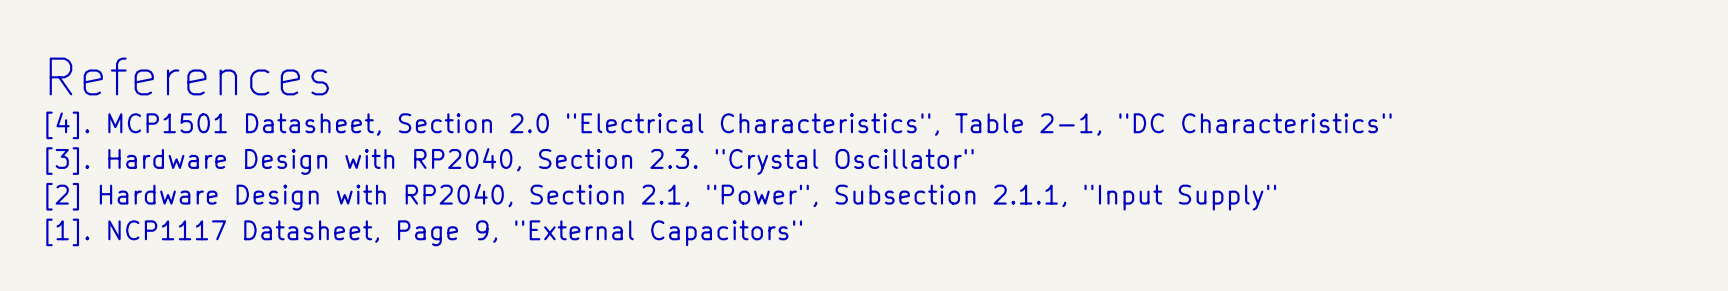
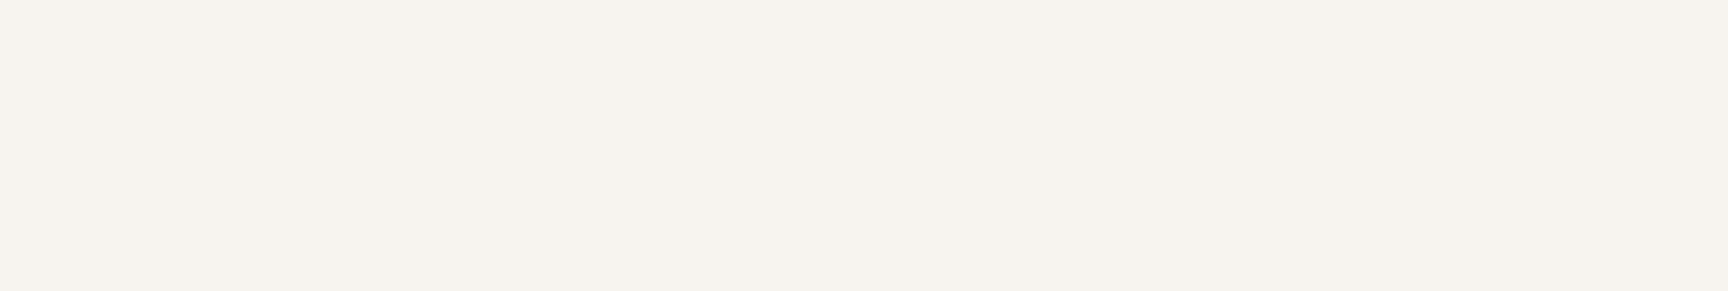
text: References (189, 76) -> none
text: [4]. MCP1501 Datasheet, Section 2.0 "Electrical Characteristics", Table 2-1, "DC Characteristics" (718, 125) -> none
text: [3]. Hardware Design with RP2040, Section 2.3. "Crystal Oscillator" (509, 161) -> none
text: [2] Hardware Design with RP2040, Section 2.1, "Power", Subsection 2.1.1, "Input Supply" (661, 196) -> none
text: [1]. NCP1117 Datasheet, Page 9, "External Capacitors" (424, 232) -> none

